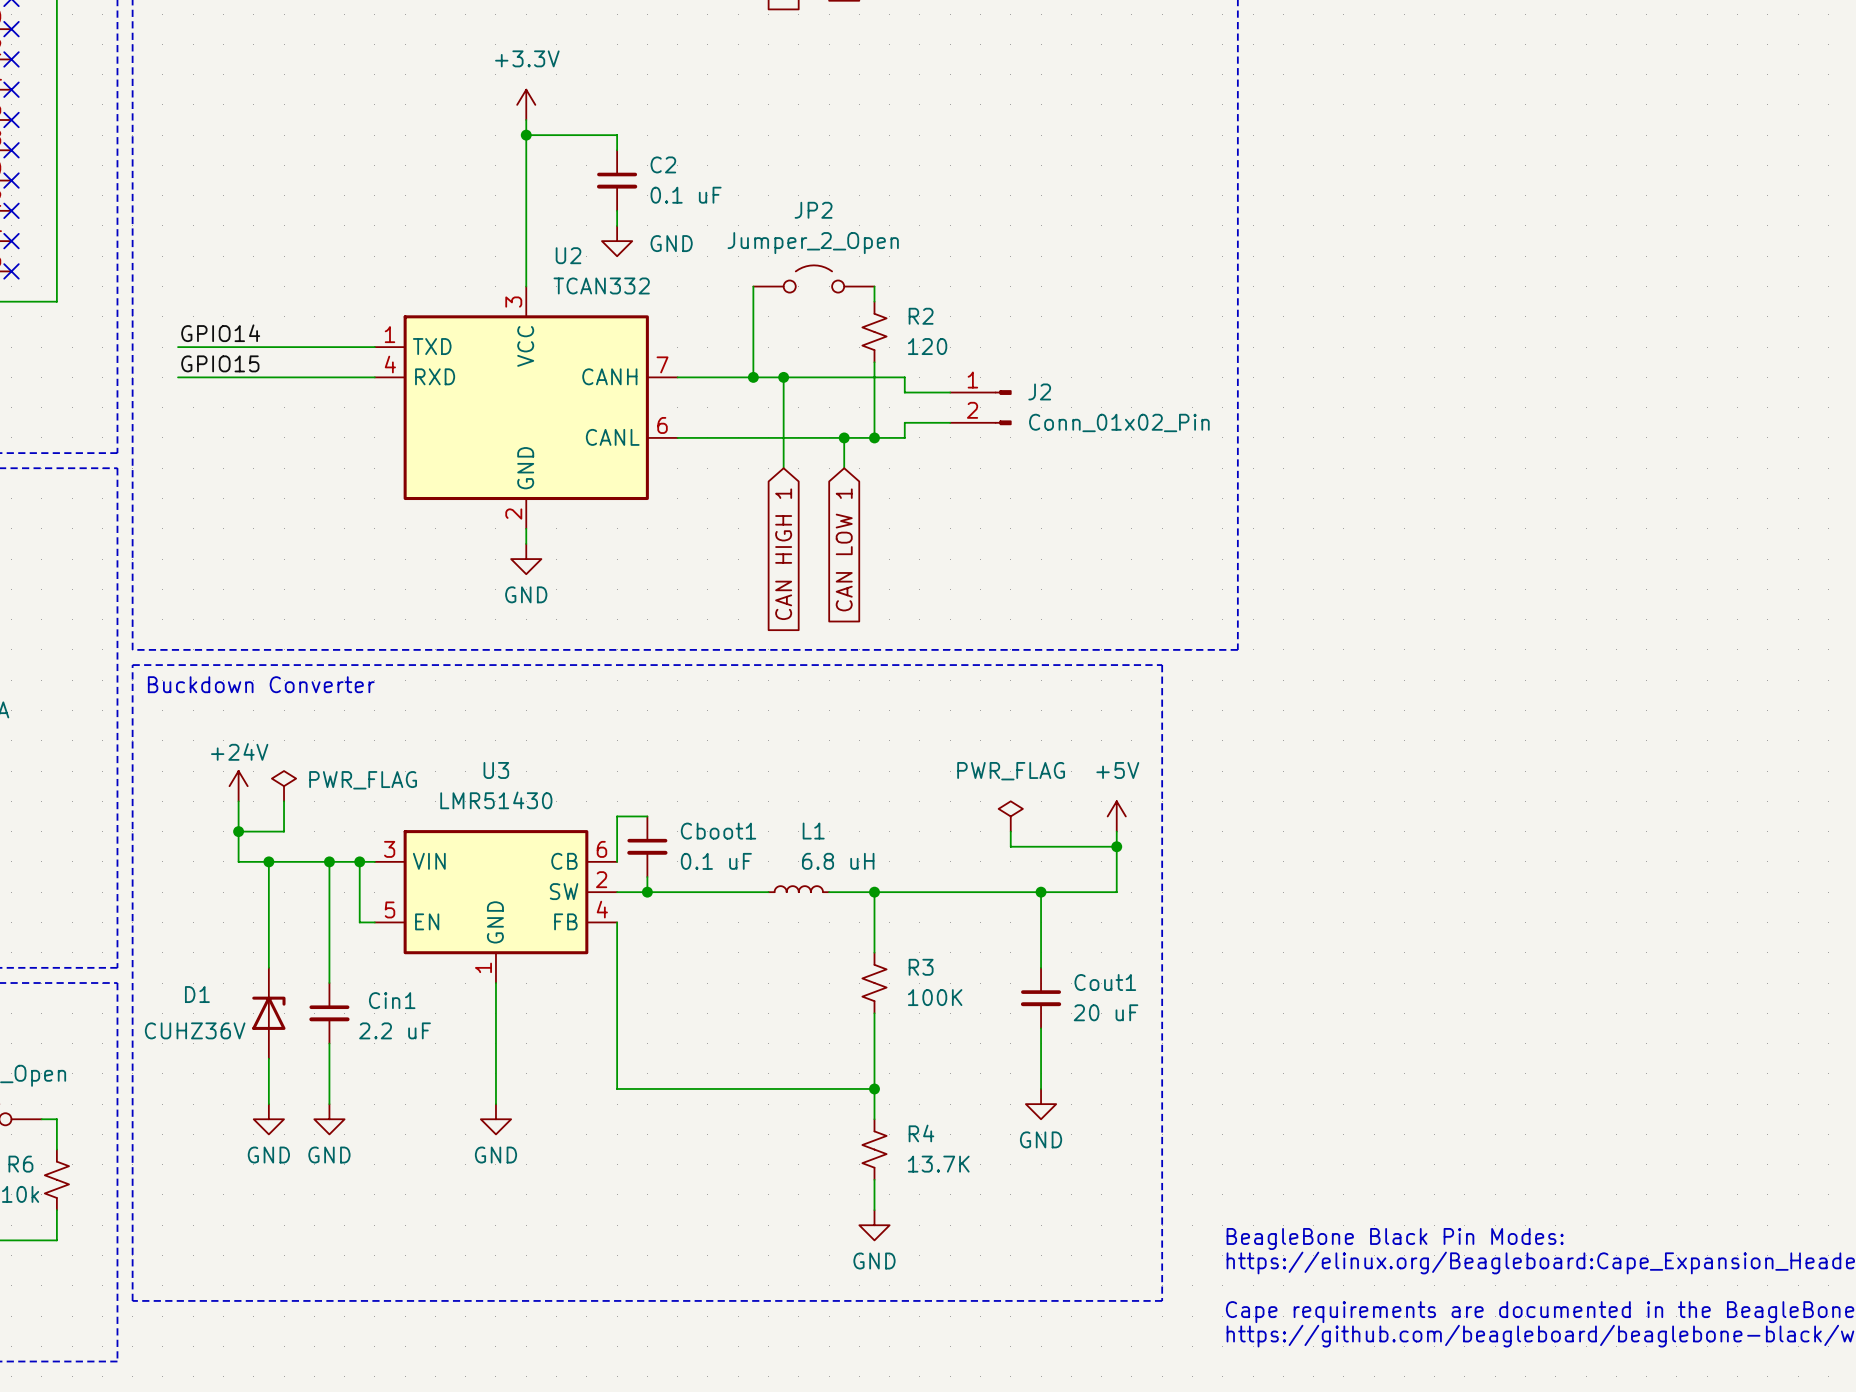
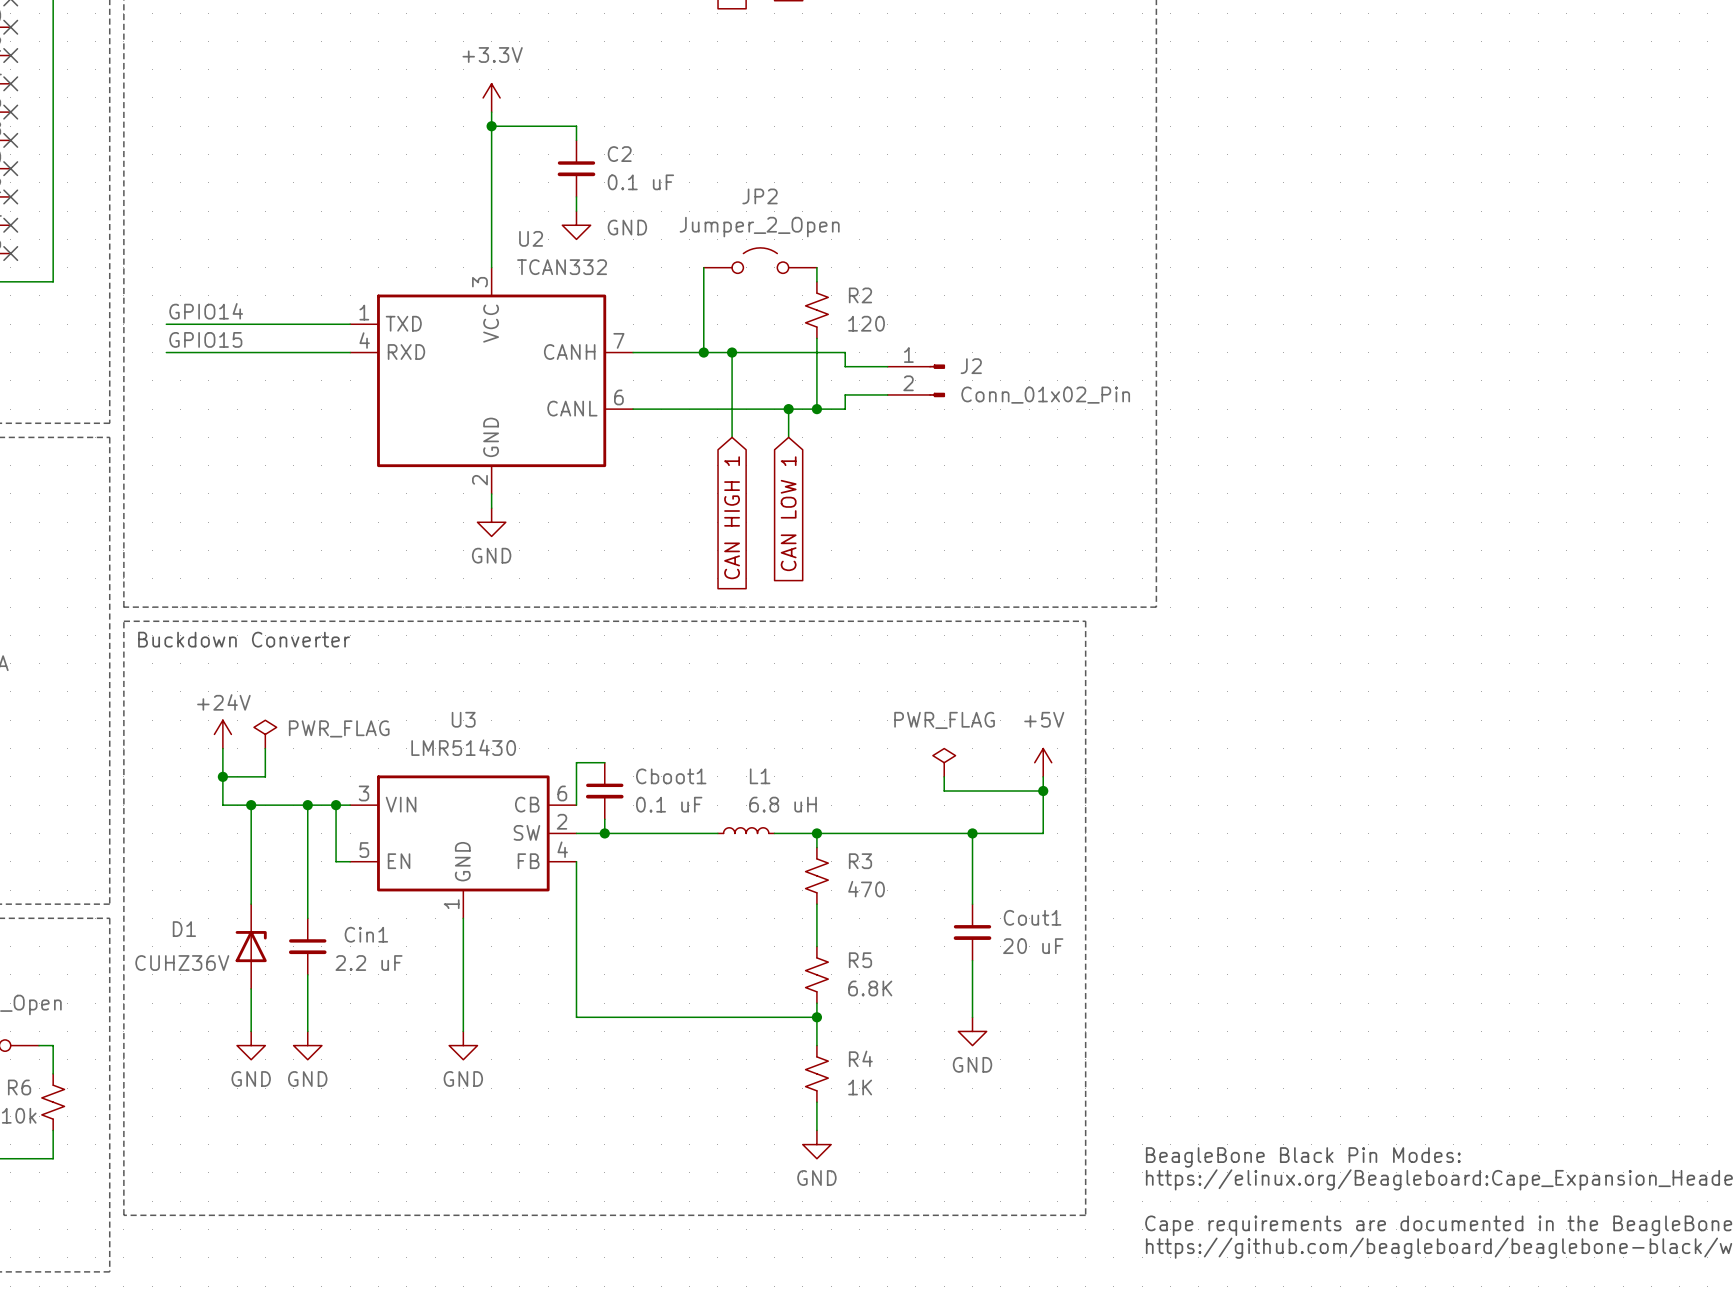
wire: (874, 907) (874, 952) -> none
R3 position: (874, 983) -> (816, 875)
R3 value: 100K (935, 997) -> 470 (866, 889)
R5: none -> 6.8K (816, 974)
R4 value: 13.7K (938, 1164) -> 1K (860, 1087)

